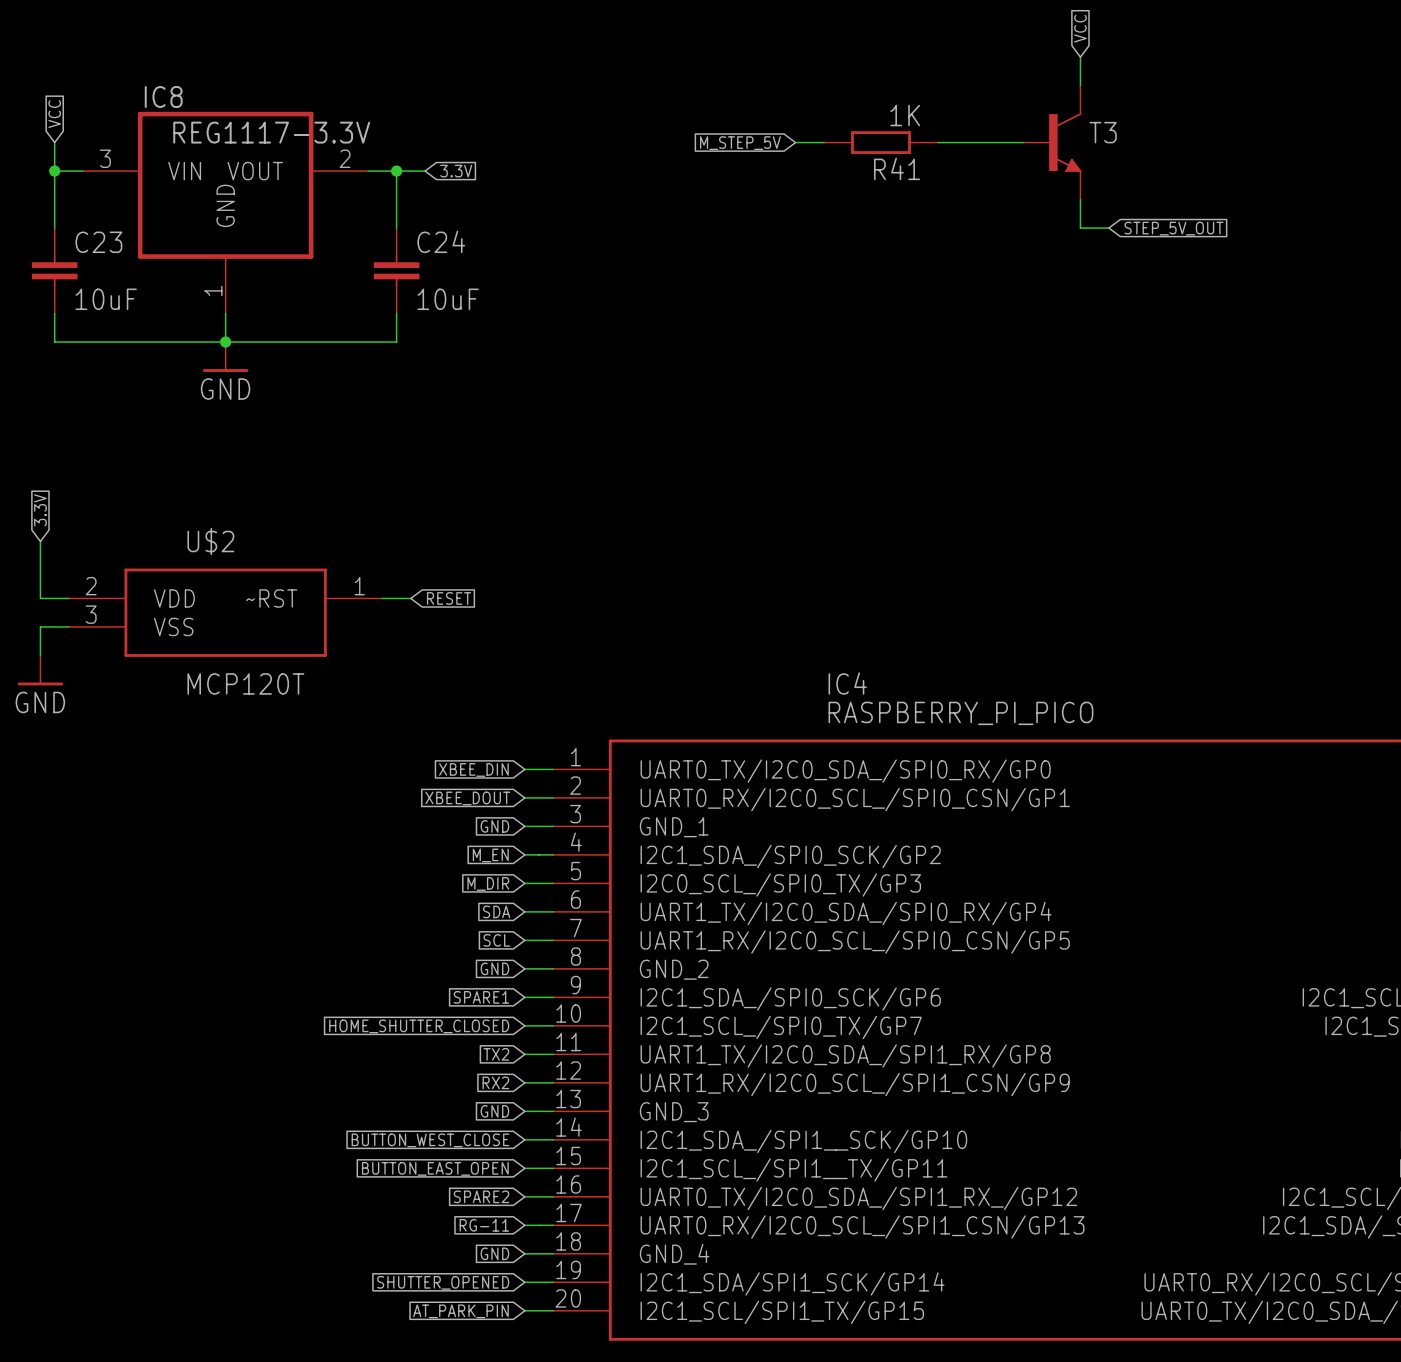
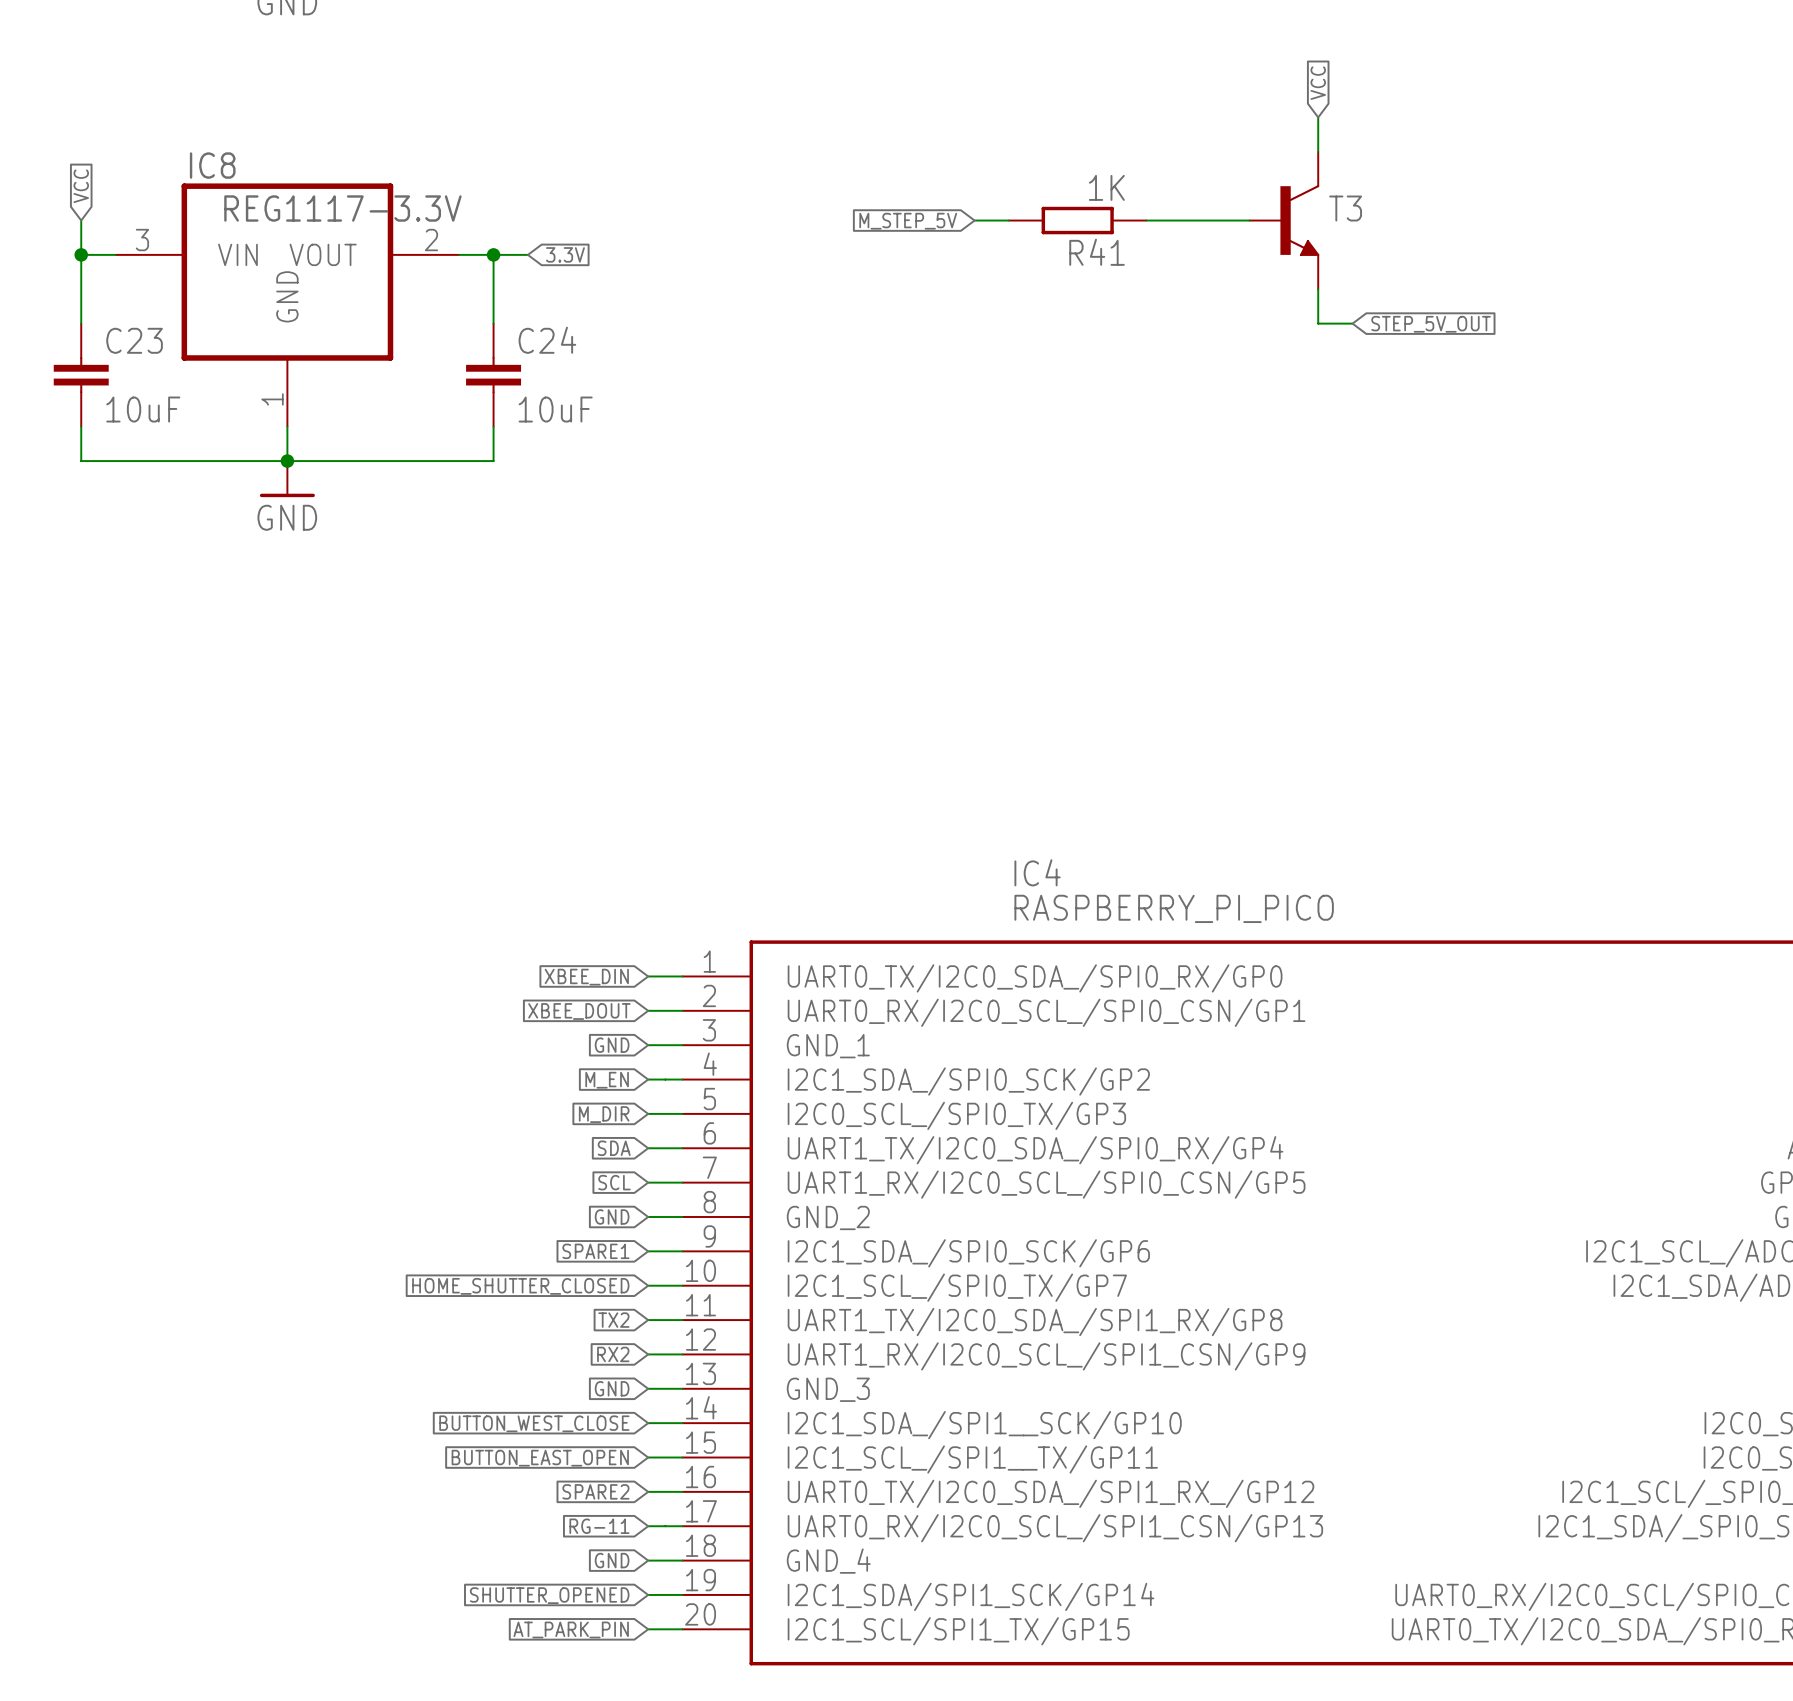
global label: 3.3V (40, 510) -> none
wire: (40, 541) (40, 598) (68, 598) -> none
wire: (382, 598) (410, 598) -> none
global label: RESET (449, 598) -> none
U$2: MCP120T (225, 612) -> none
wire: (68, 626) (40, 626) (40, 655) -> none
power symbol: GND (40, 670) -> none

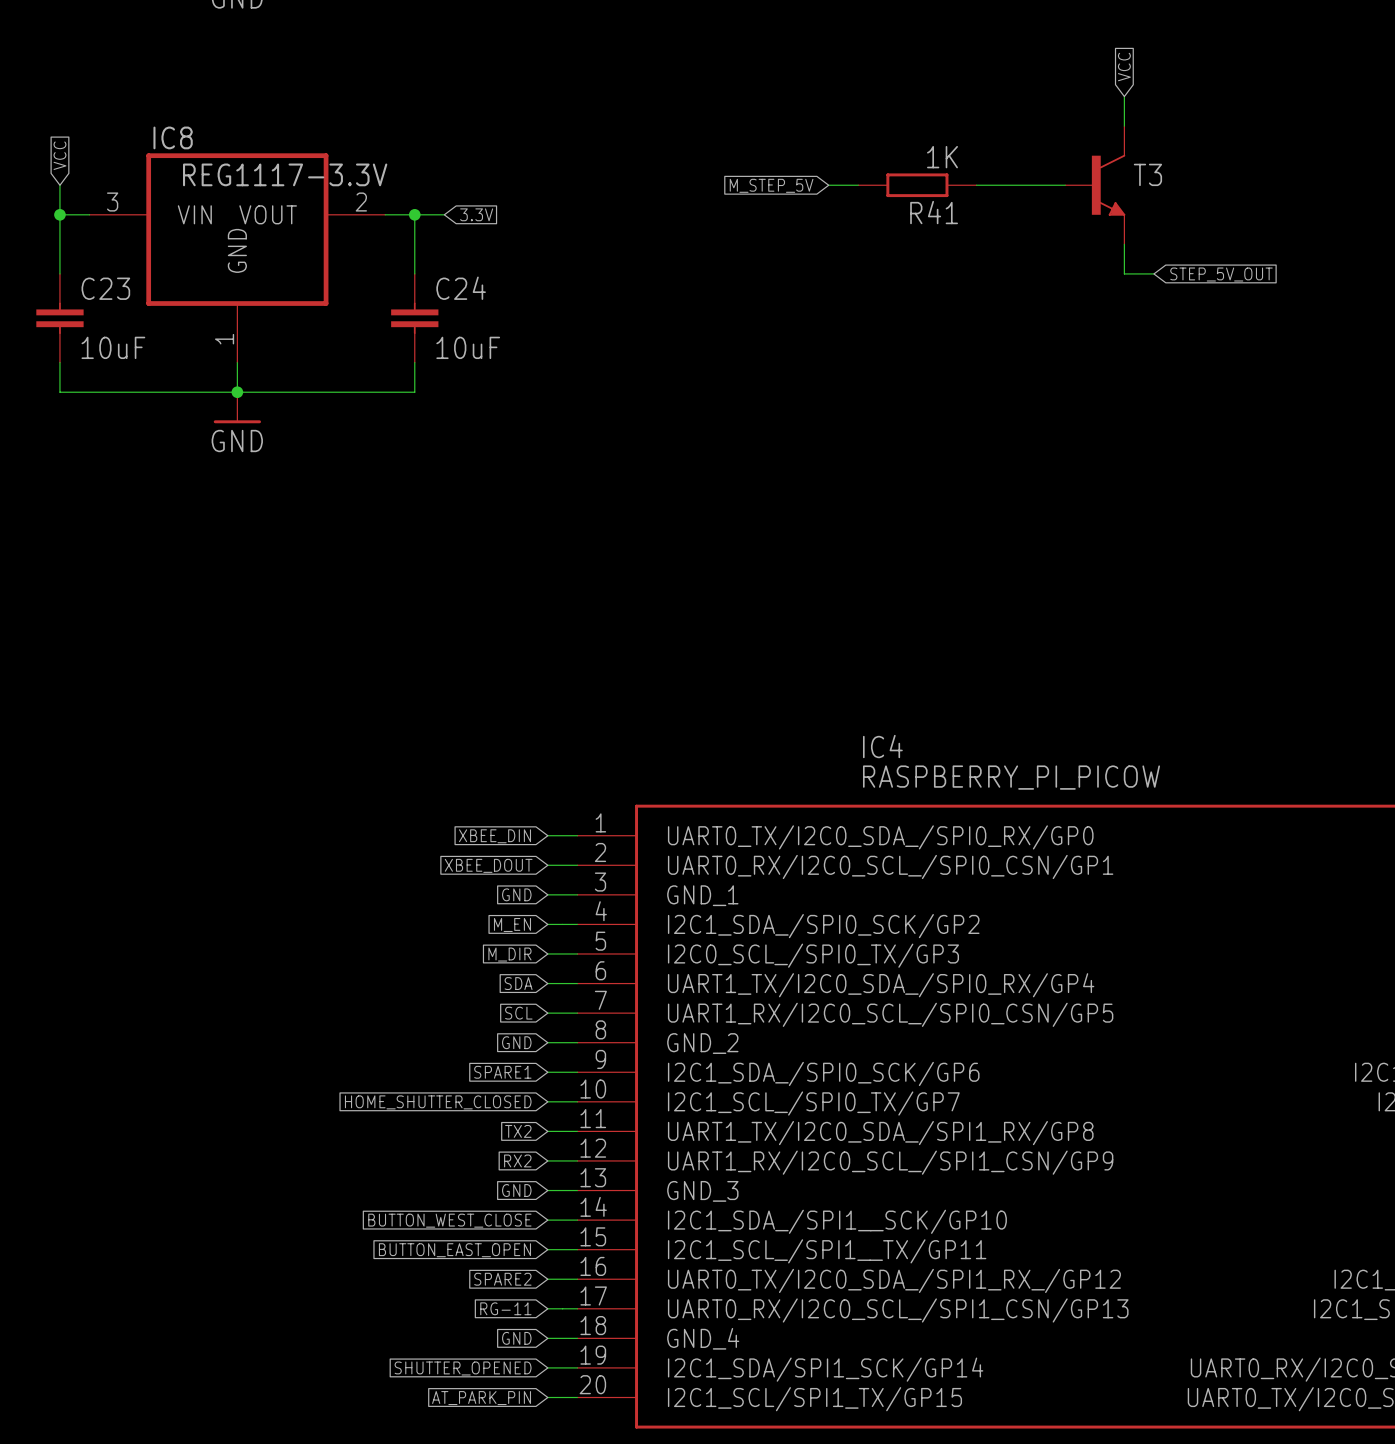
IC4 value: RASPBERRY_PI_PICO (1174, 908) -> RASPBERRY_PI_PICOW (1011, 777)

